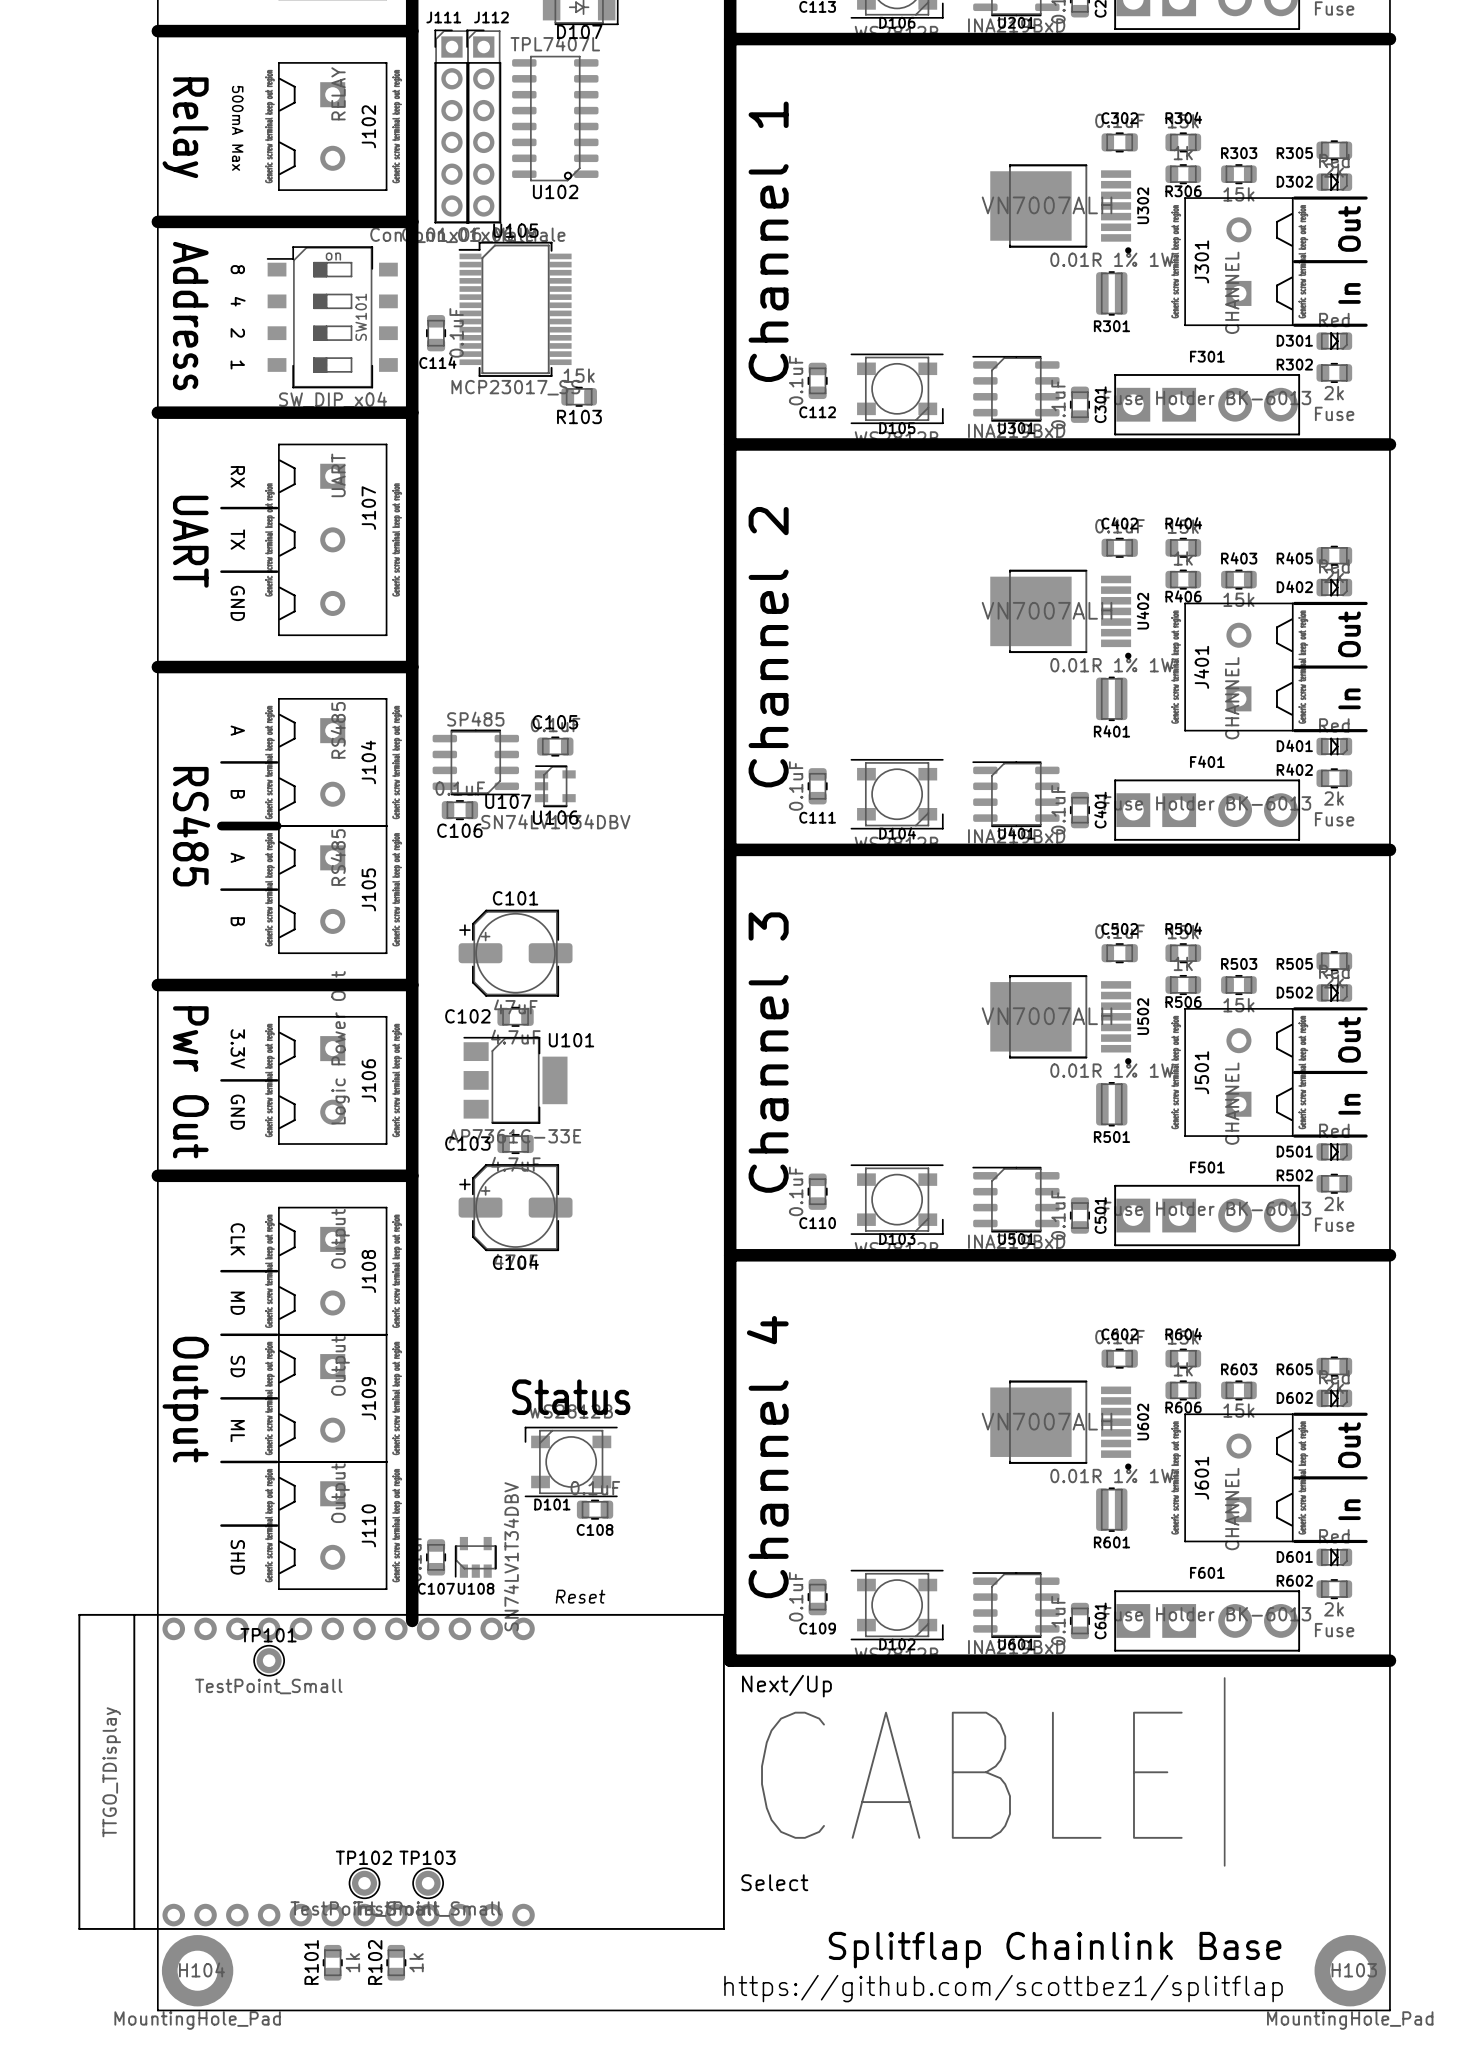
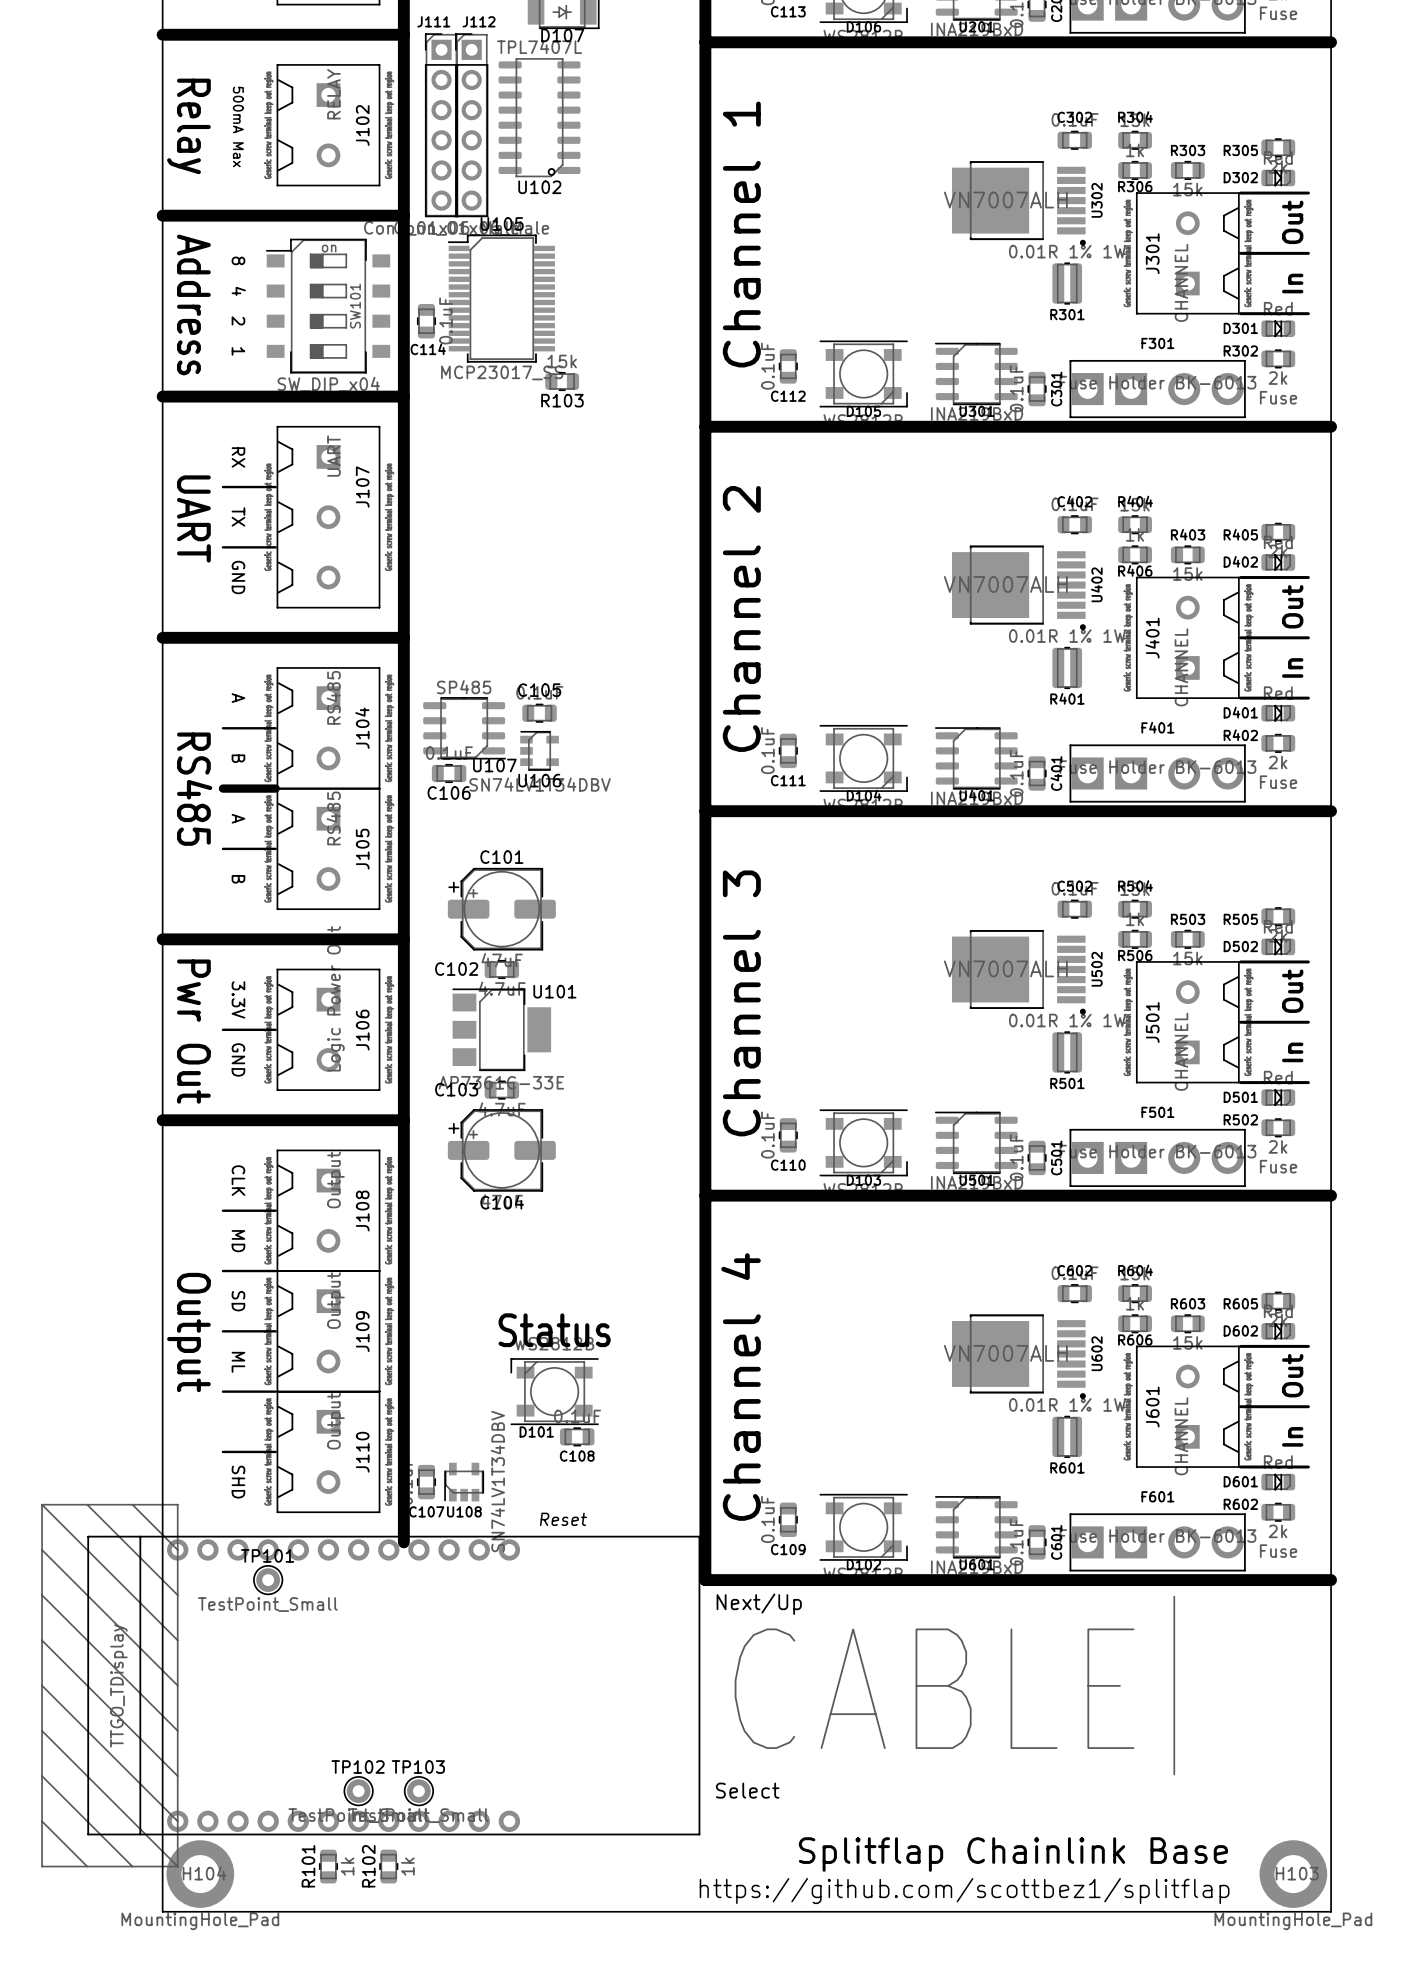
part: none -> TTGO_TDisplay (608, 1685)
part: TTGO_TDisplay (651, 1771) -> none

